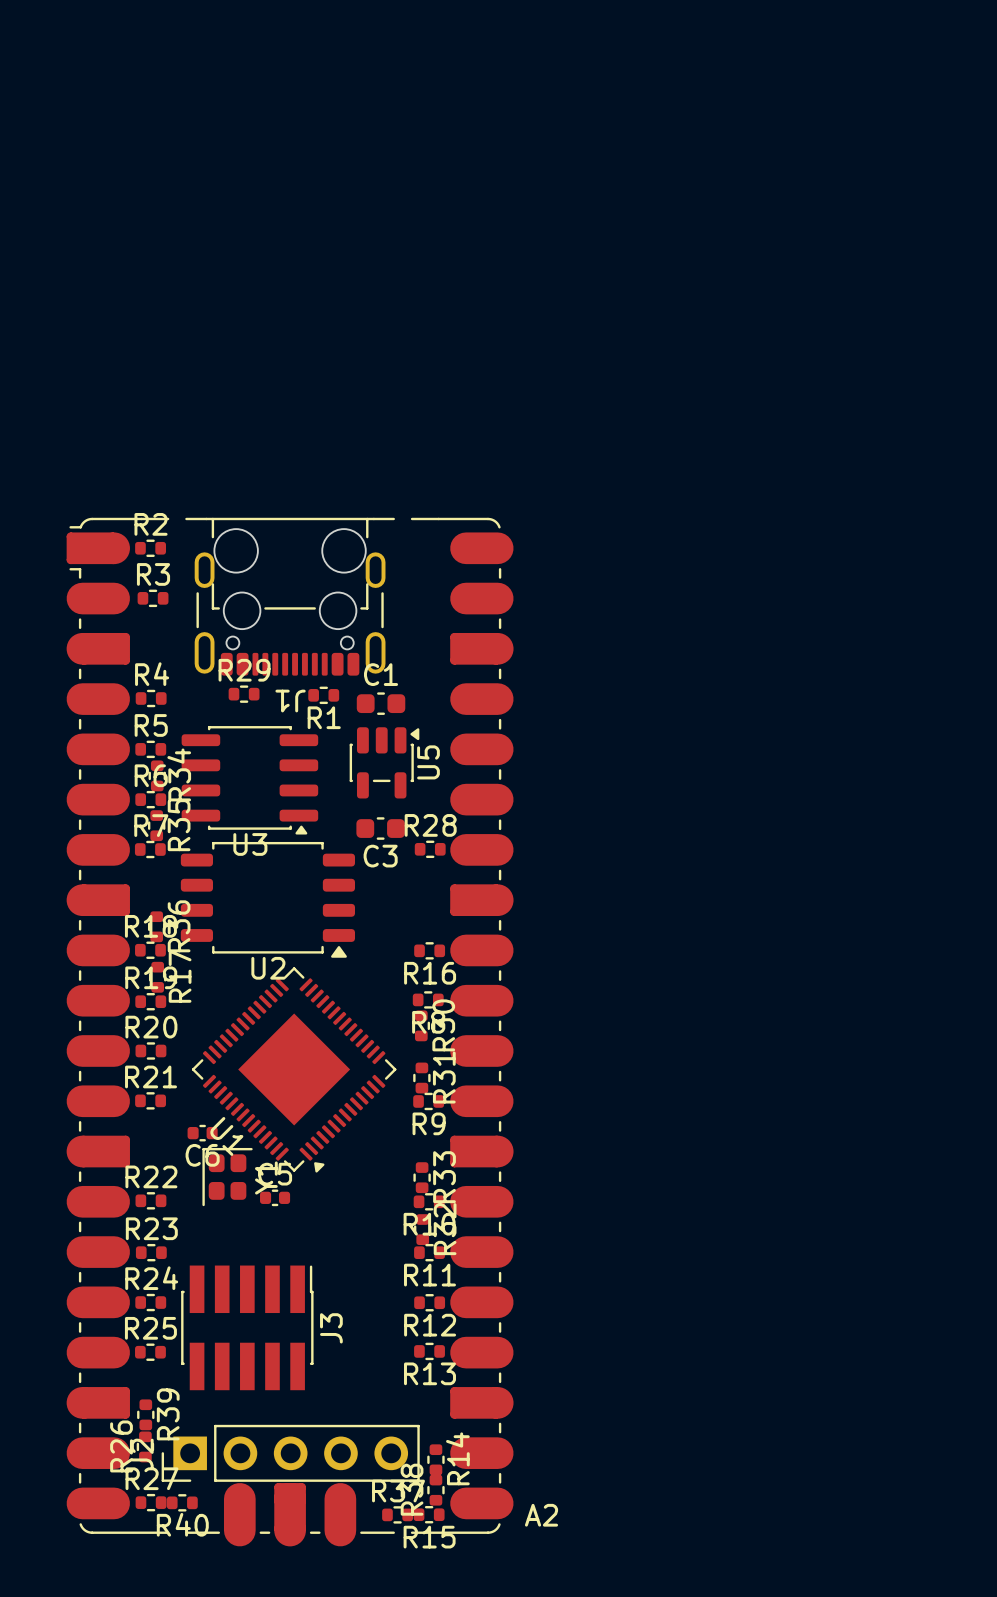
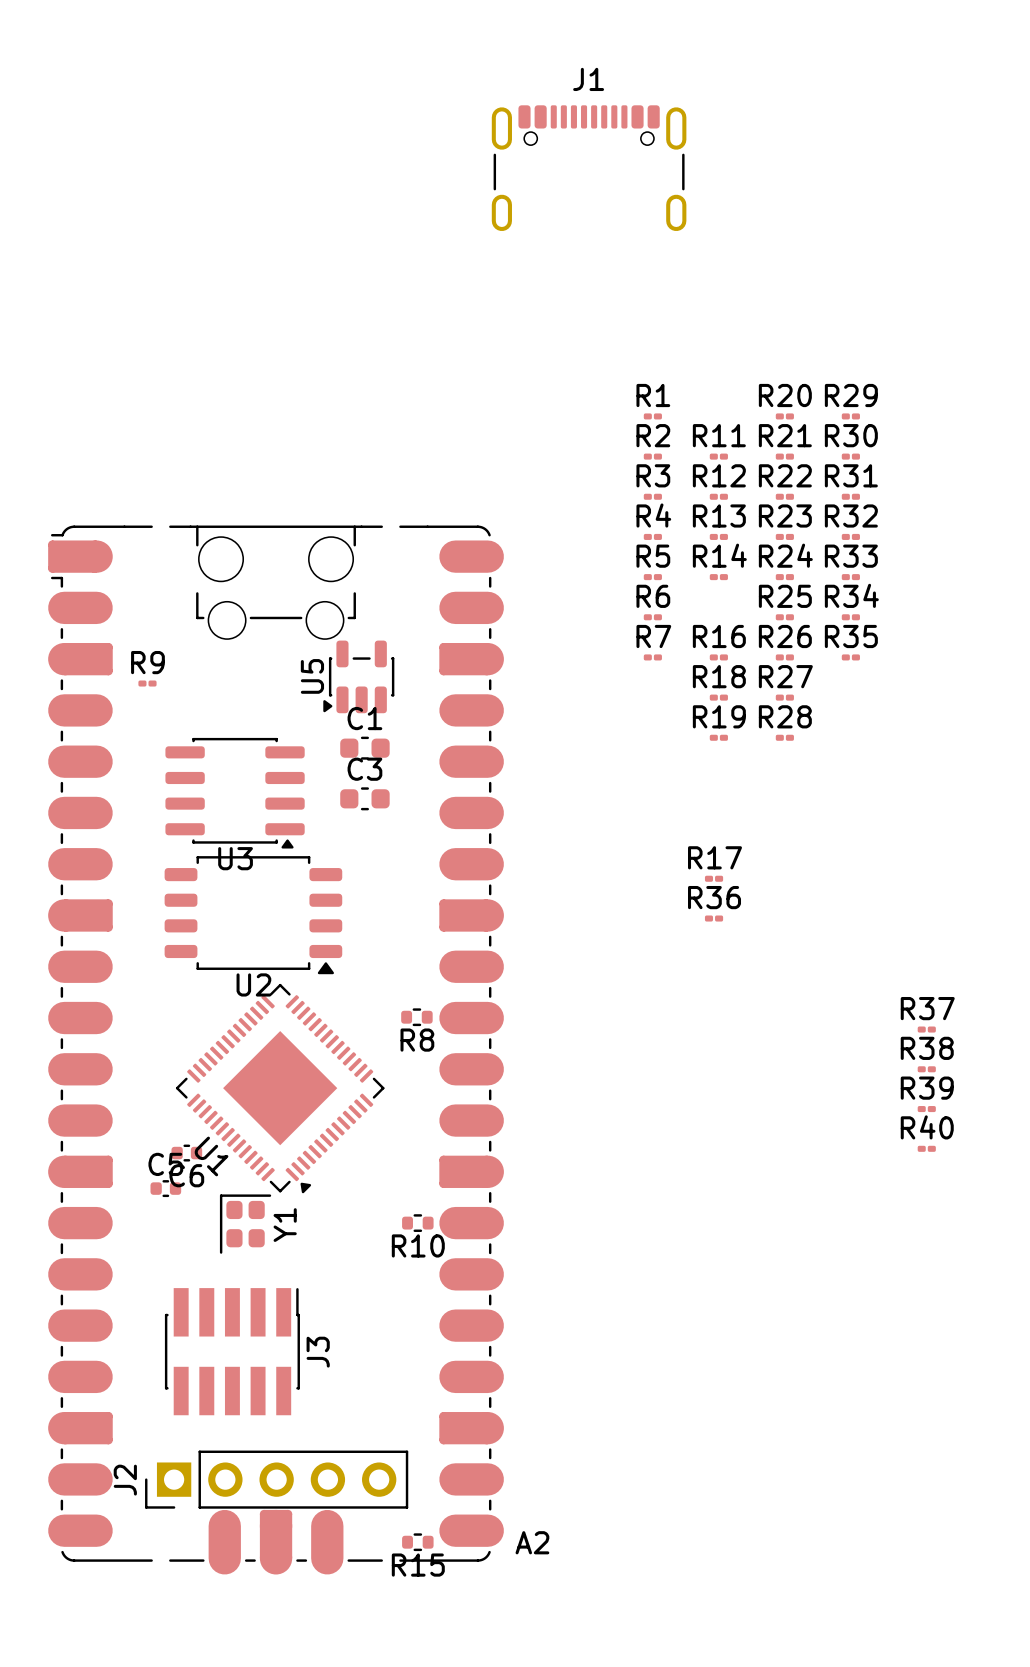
R2 footprint: [135, 539, 166, 557] -> [643, 453, 662, 460]
R3 footprint: [137, 589, 169, 608] -> [643, 493, 662, 500]
J1 rotation: 0° (290, 613) -> 180° (589, 168)
J1 position: (290, 613) -> (589, 168)
R29 footprint: [228, 685, 260, 703] -> [841, 413, 860, 420]
R1 footprint: [308, 686, 340, 705] -> [643, 413, 662, 420]
R4 footprint: [135, 689, 167, 708] -> [643, 533, 662, 540]
C1 position: (381, 703) -> (364, 748)
R1 name position: R1 (324, 717) -> R1 (653, 395)
R5 footprint: [135, 740, 167, 759] -> [643, 574, 662, 581]
R34 footprint: [148, 760, 166, 792] -> [841, 614, 860, 621]
U5 rotation: 0° (384, 762) -> 180° (358, 676)
U5 position: (384, 762) -> (358, 676)
R6 footprint: [135, 790, 167, 809] -> [643, 614, 662, 621]
R35 footprint: [147, 810, 166, 842] -> [841, 654, 860, 661]
C3 position: (380, 828) -> (364, 798)
R7 footprint: [134, 840, 166, 859] -> [643, 654, 662, 661]
R28 footprint: [414, 840, 446, 859] -> [775, 734, 794, 741]
C3 name position: C3 (380, 856) -> C3 (364, 769)
R36 footprint: [147, 911, 166, 943] -> [704, 915, 724, 922]
R18 footprint: [135, 941, 166, 959] -> [709, 694, 728, 701]
R16 footprint: [414, 942, 446, 960] -> [709, 654, 728, 661]
R17 footprint: [148, 961, 167, 993] -> [704, 875, 724, 882]
R16 name position: R16 (430, 973) -> R16 (719, 636)
R19 footprint: [135, 993, 167, 1011] -> [709, 734, 728, 741]
R30 footprint: [412, 1010, 431, 1042] -> [841, 453, 860, 460]
R20 footprint: [135, 1042, 167, 1060] -> [775, 413, 794, 420]
R31 footprint: [413, 1062, 431, 1094] -> [841, 493, 860, 500]
R21 footprint: [135, 1092, 166, 1110] -> [775, 453, 794, 460]
R9 footprint: [413, 1092, 445, 1111] -> [138, 680, 157, 687]
R9 name position: R9 (429, 1123) -> R9 (147, 662)
R33 footprint: [413, 1162, 431, 1194] -> [841, 574, 860, 581]
Y1 position: (227, 1177) -> (245, 1224)
R22 footprint: [135, 1192, 167, 1210] -> [775, 493, 794, 500]
C5 position: (275, 1197) -> (165, 1188)
R32 footprint: [413, 1214, 432, 1246] -> [841, 533, 860, 540]
R23 footprint: [135, 1243, 167, 1262] -> [775, 533, 794, 540]
R11 footprint: [414, 1243, 445, 1262] -> [709, 453, 728, 460]
R11 name position: R11 (429, 1275) -> R11 (719, 435)
R24 footprint: [135, 1293, 167, 1312] -> [775, 574, 794, 581]
R12 footprint: [414, 1294, 446, 1312] -> [709, 493, 728, 500]
R12 name position: R12 (430, 1325) -> R12 (719, 475)
R13 footprint: [414, 1342, 445, 1361] -> [709, 533, 728, 540]
R25 footprint: [135, 1343, 166, 1361] -> [775, 614, 794, 621]
R13 name position: R13 (429, 1373) -> R13 (719, 516)
R39 footprint: [137, 1399, 155, 1431] -> [917, 1106, 936, 1113]
R26 footprint: [136, 1431, 155, 1463] -> [775, 654, 794, 661]
R14 footprint: [427, 1444, 445, 1476] -> [709, 574, 728, 581]
R38 footprint: [427, 1474, 445, 1506] -> [917, 1066, 936, 1073]
R27 footprint: [135, 1493, 167, 1512] -> [775, 694, 794, 701]
R40 footprint: [166, 1494, 198, 1512] -> [917, 1145, 936, 1152]
R37 footprint: [382, 1506, 413, 1524] -> [917, 1026, 936, 1033]
R40 name position: R40 (182, 1524) -> R40 (927, 1127)

